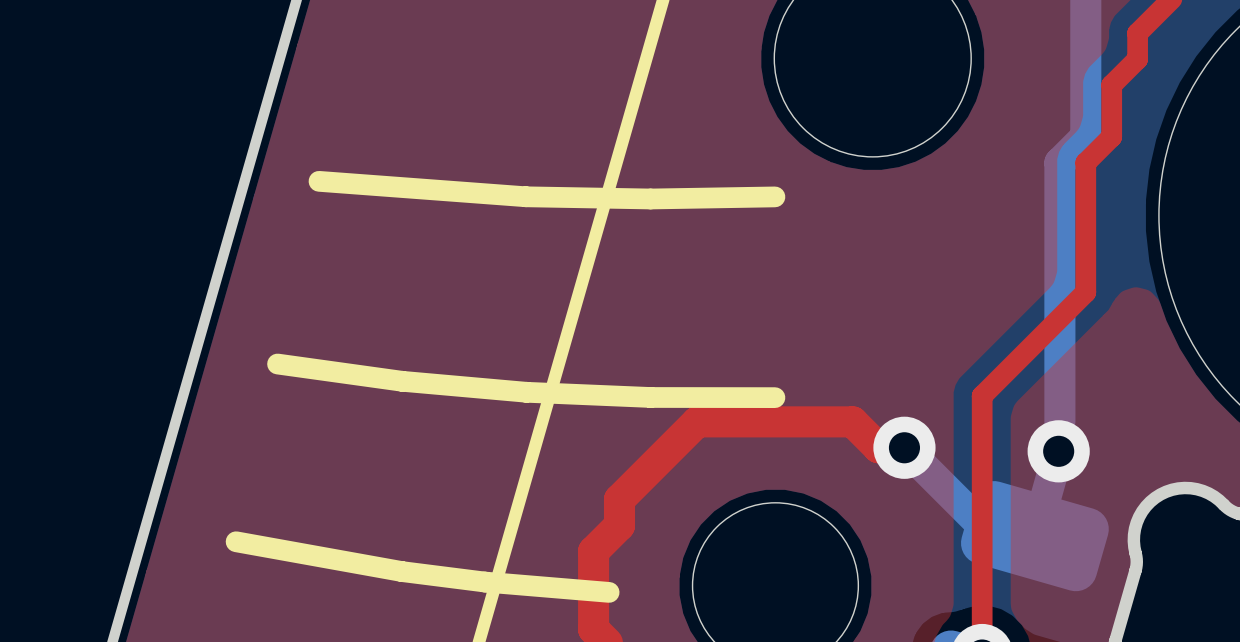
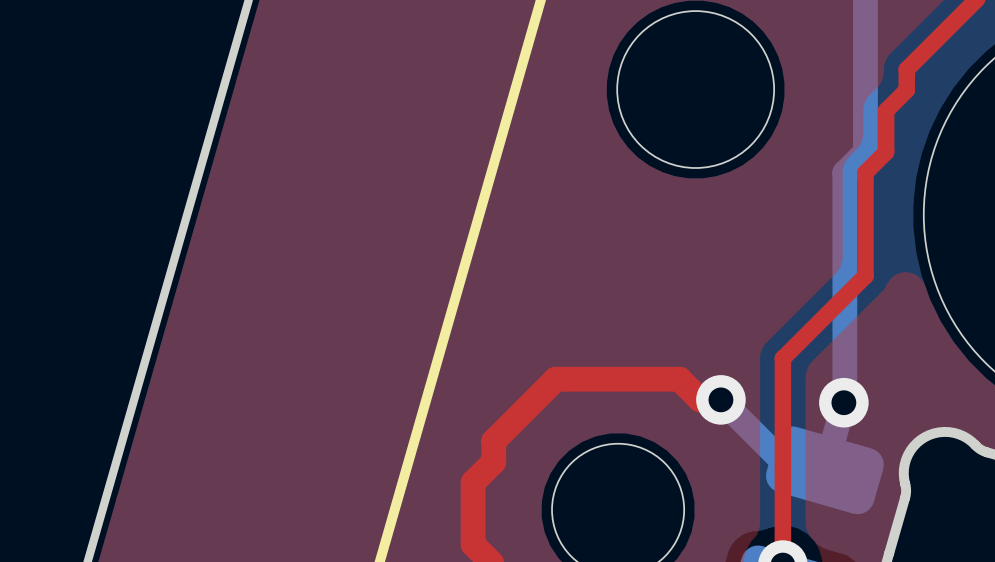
line: (318, 181) (526, 196) (650, 198) (774, 196) -> none
line: (277, 364) (401, 381) (526, 392) (650, 397) (774, 397) -> none
line: (236, 541) (401, 571) (484, 582) (609, 592) -> none

